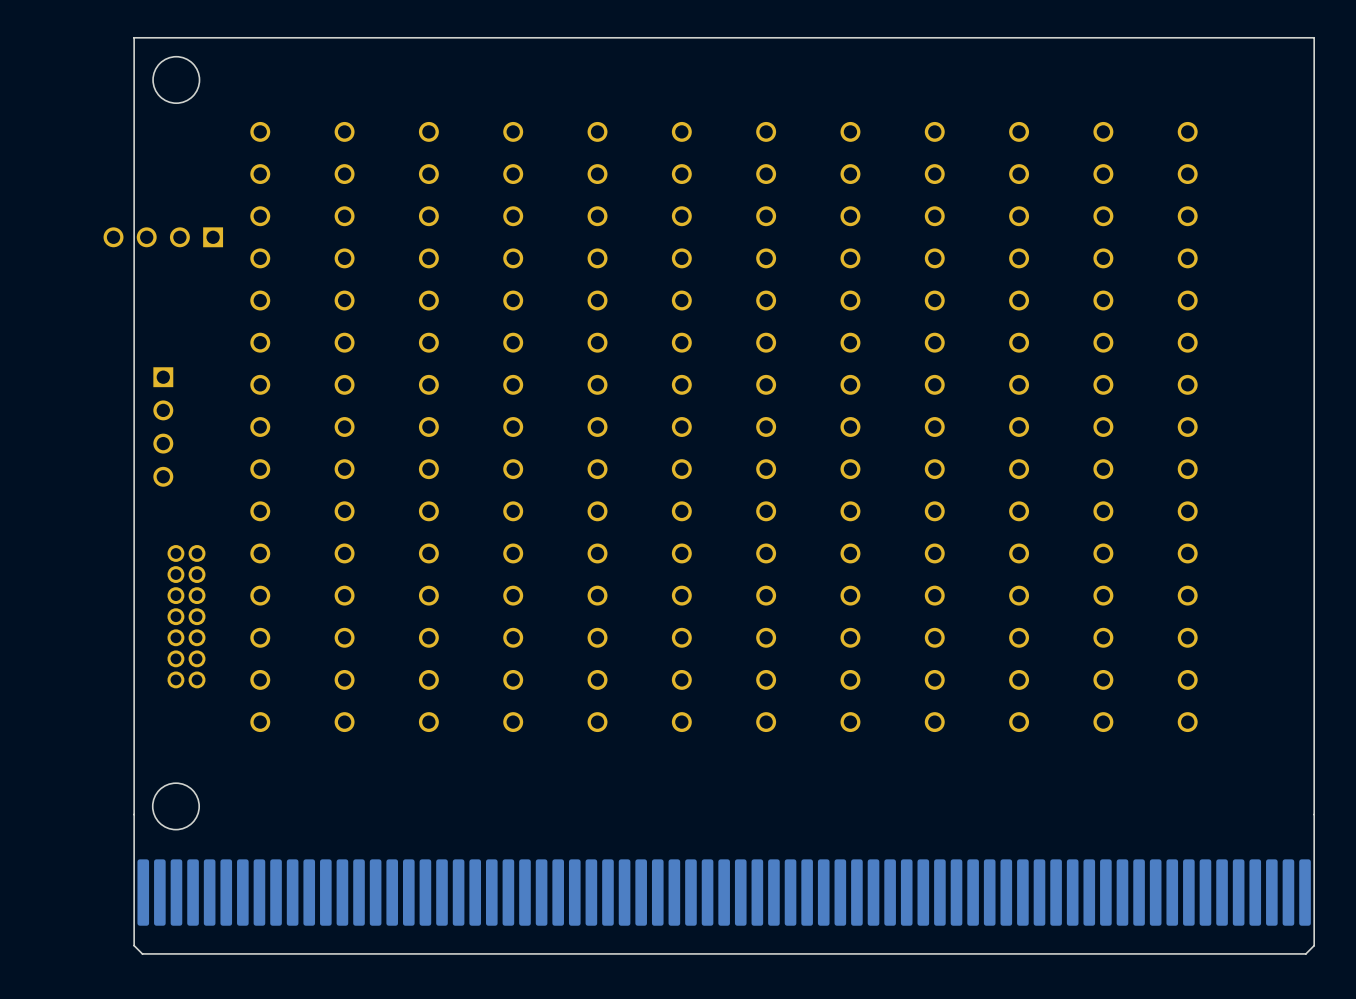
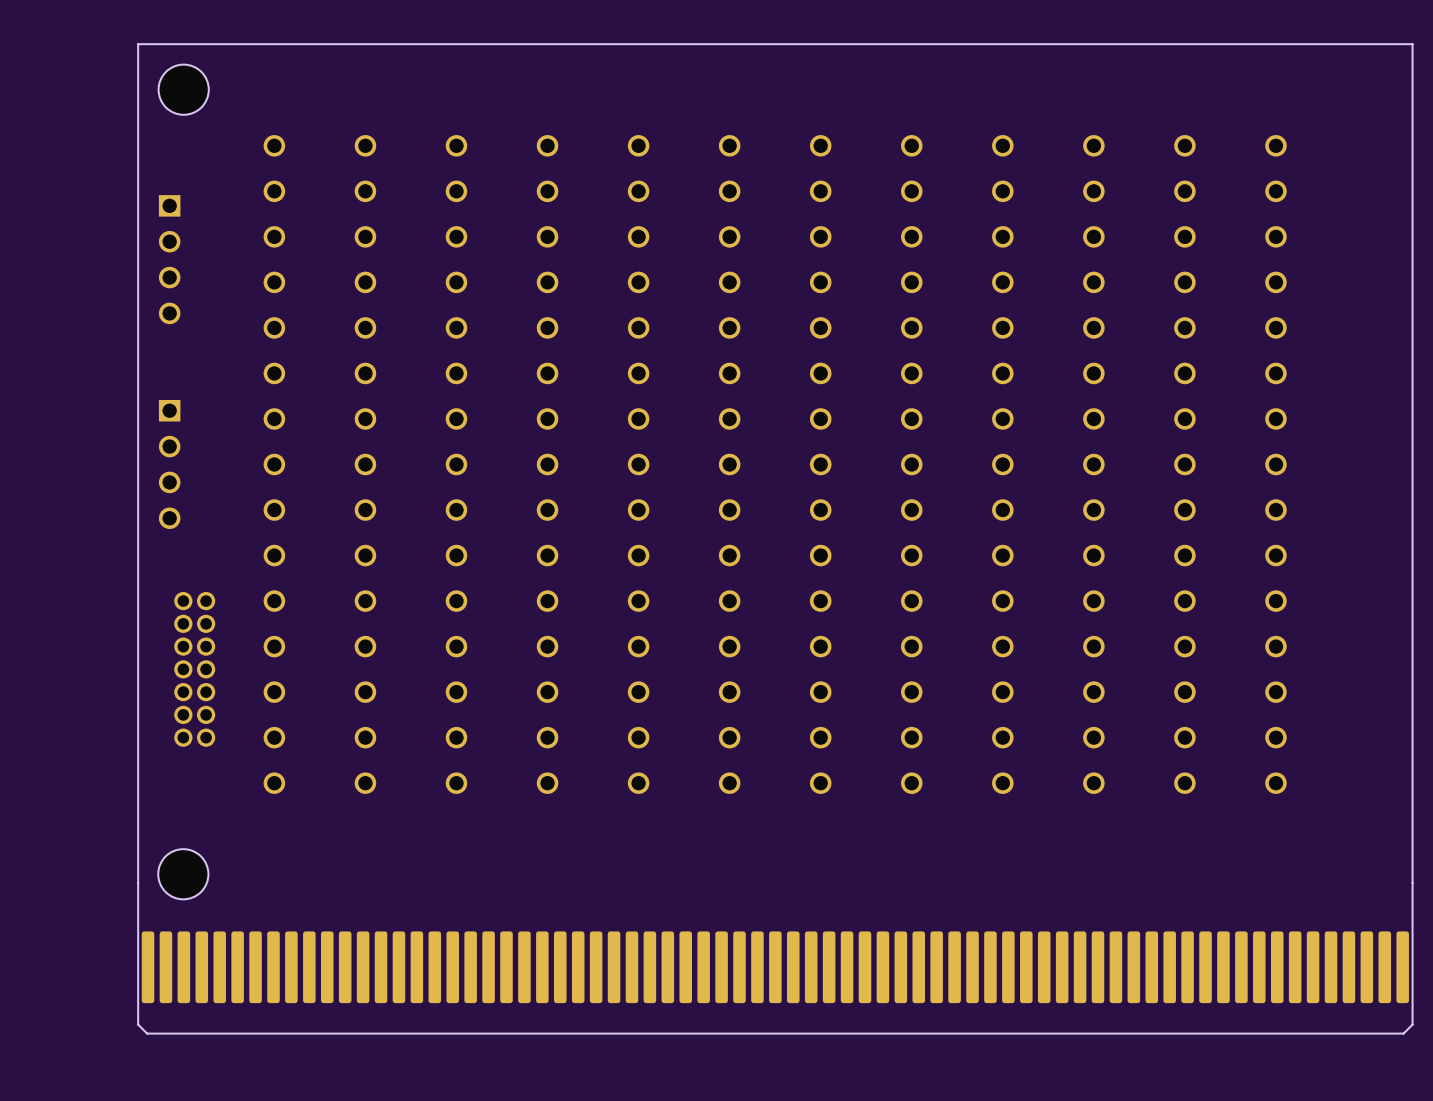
part rotation: 0° (163, 237) -> 90° counterclockwise (169, 259)

